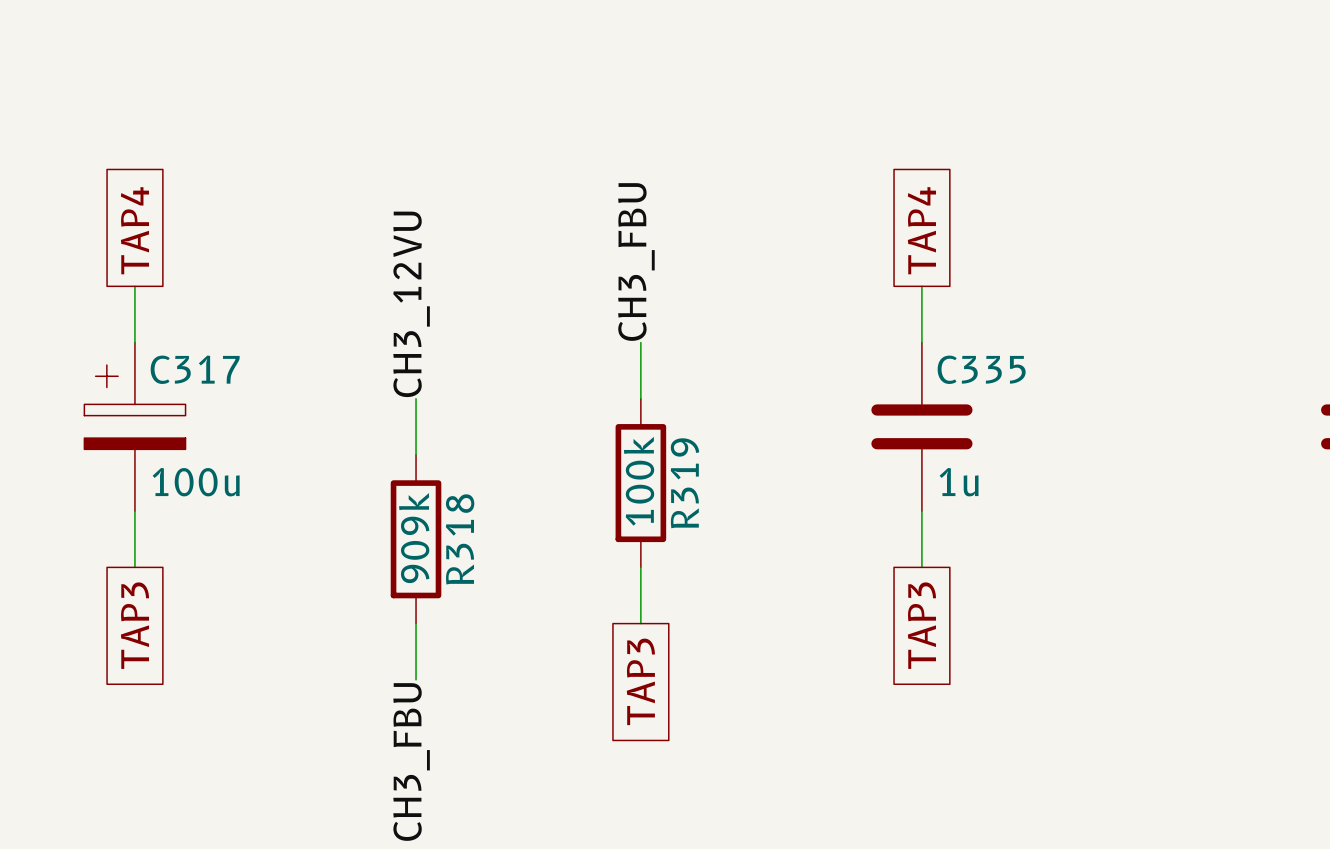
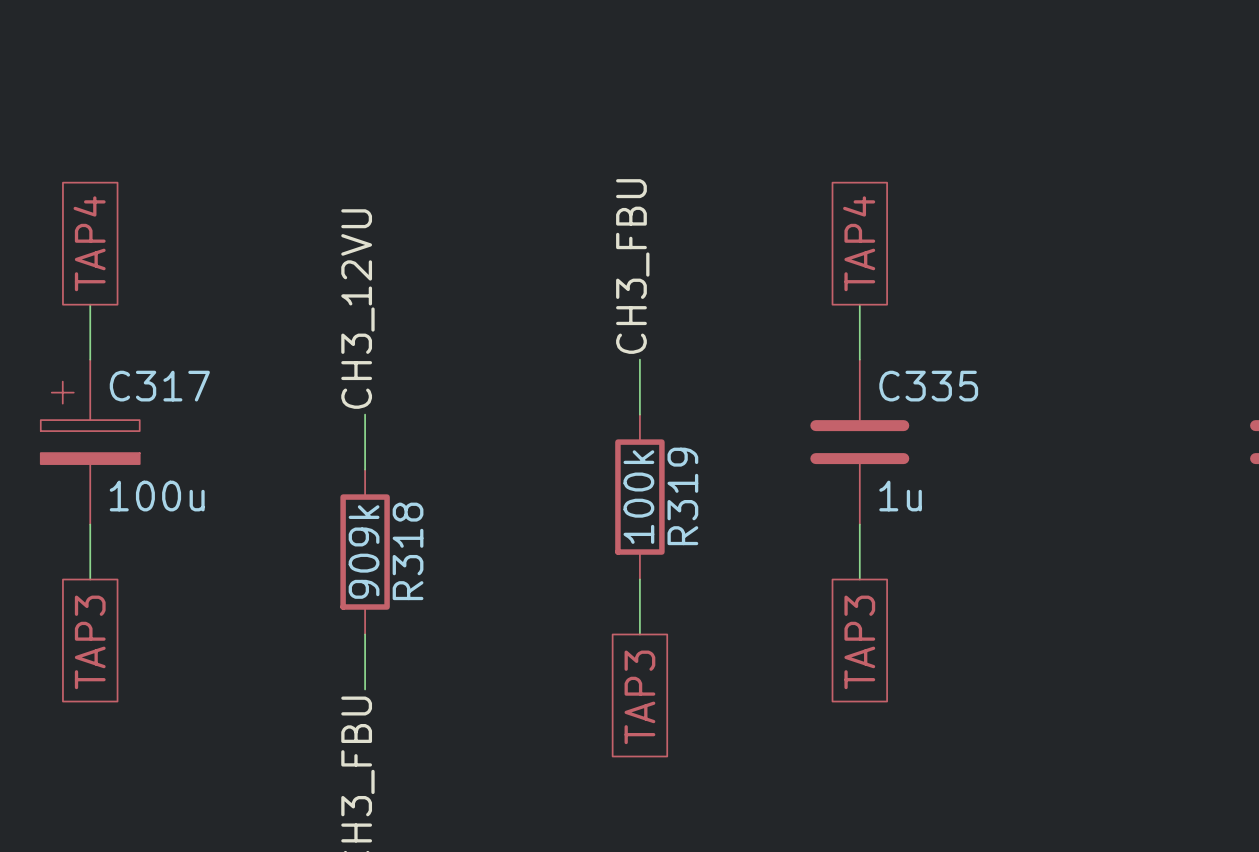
label position: CH3_FBU (636, 262) -> CH3_FBU (632, 266)
wire: (640, 342) (640, 398) -> (639, 359) (639, 414)
R319 position: (640, 483) -> (639, 497)
wire: (640, 567) (640, 623) -> (639, 579) (639, 634)
global label position: TAP3 (640, 681) -> TAP3 (639, 697)

